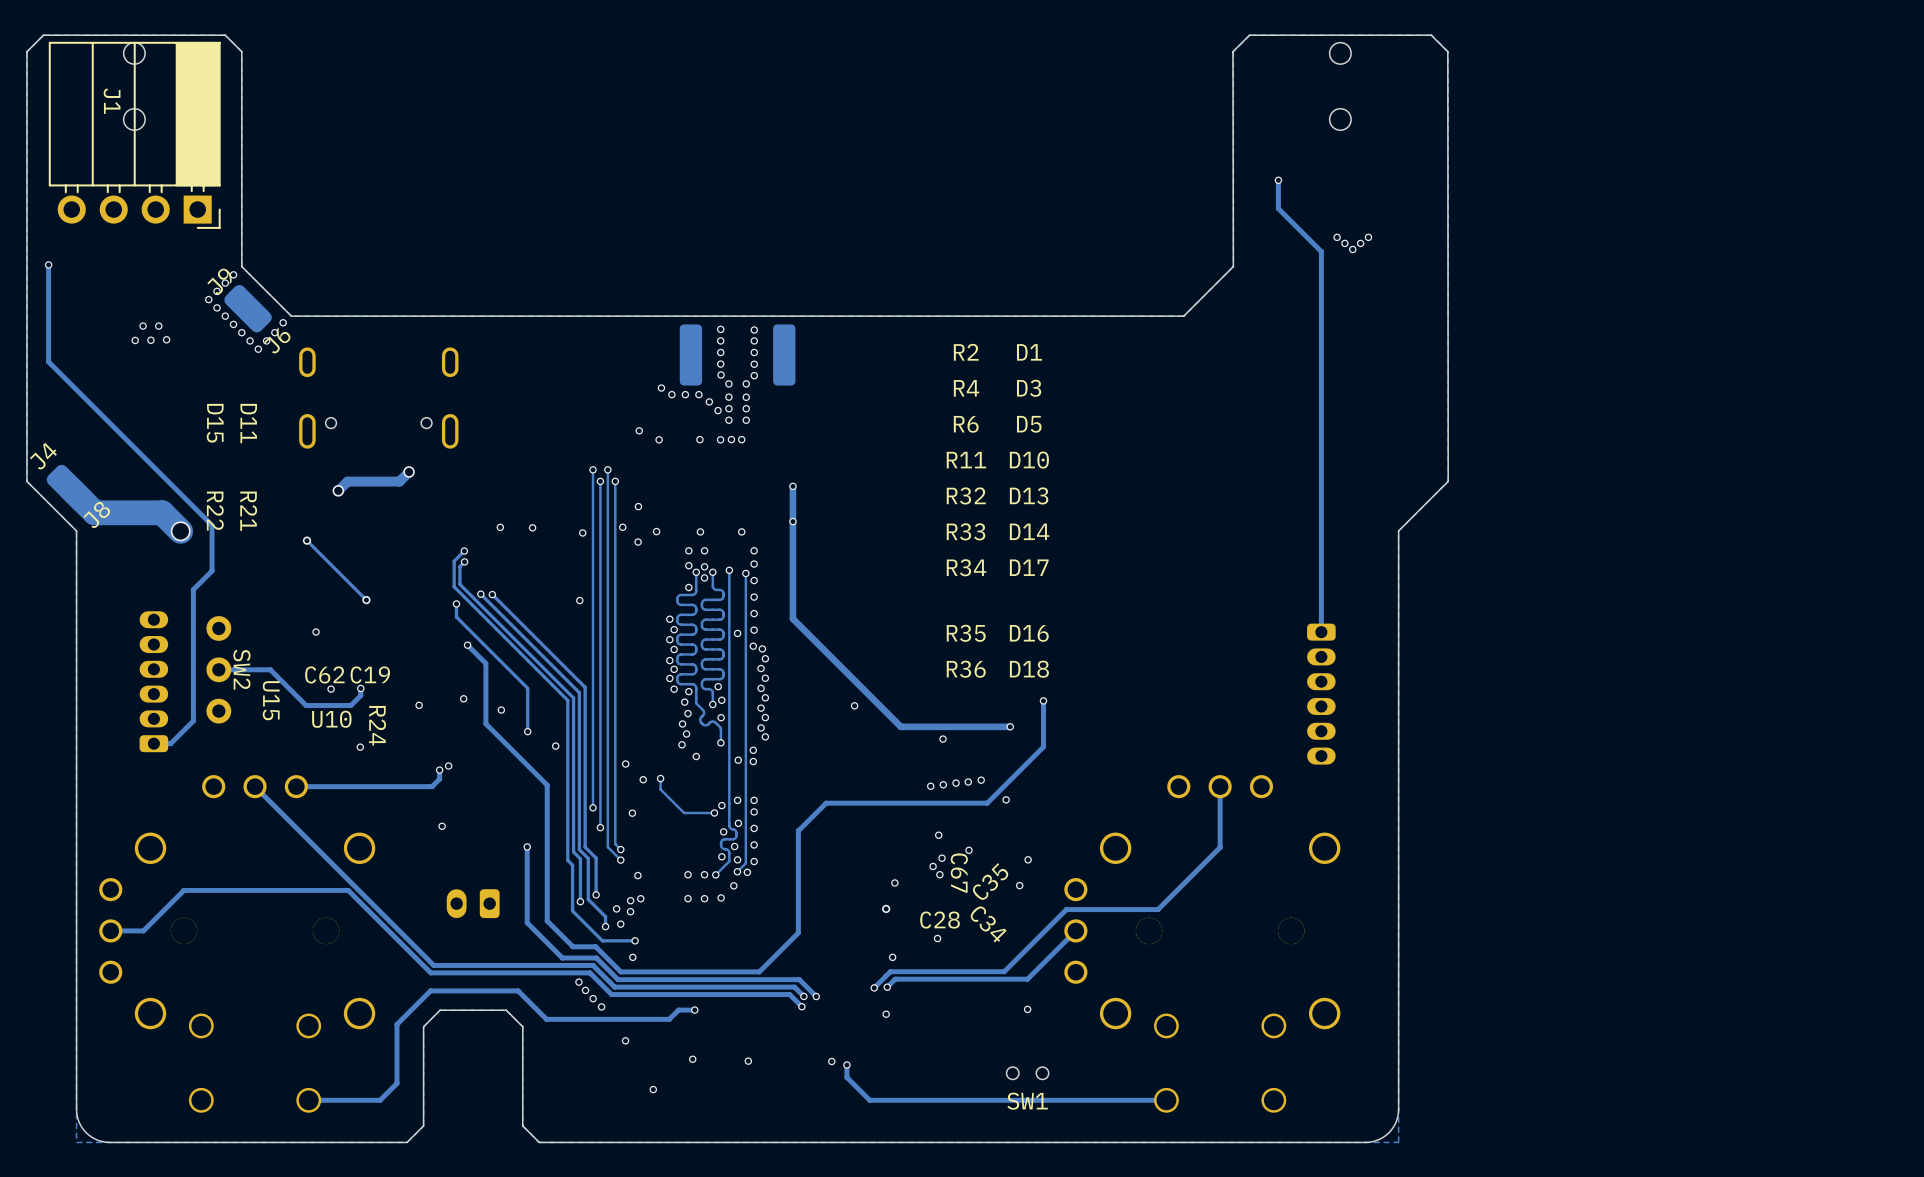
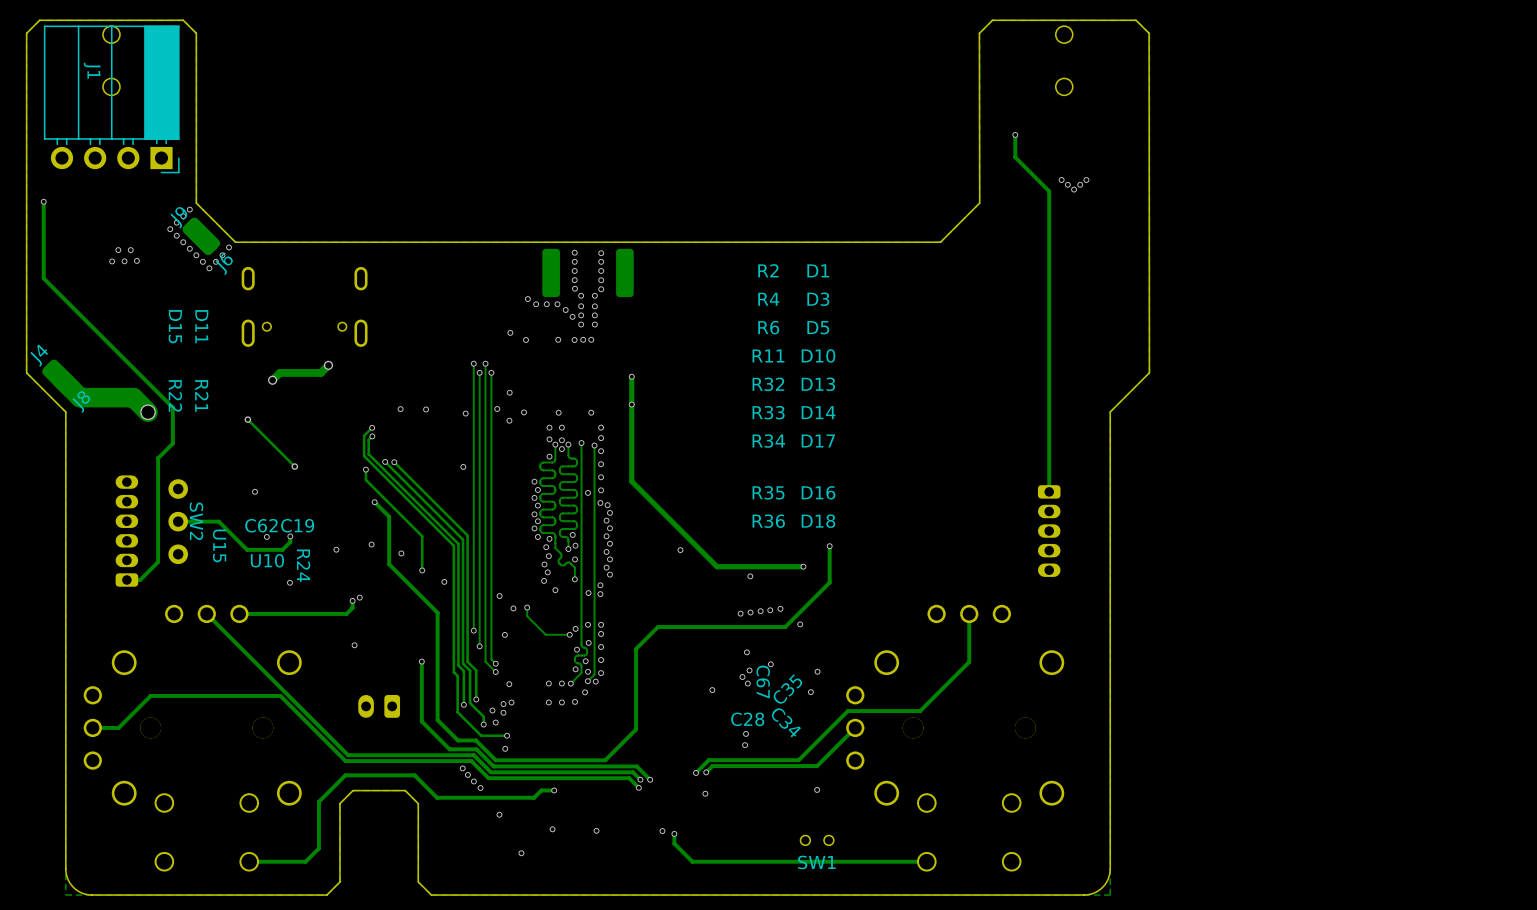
part footprint: [1307, 623, 1336, 765] -> [1037, 485, 1061, 577]
via: (886, 908) -> none
via position: (892, 957) -> (745, 745)

